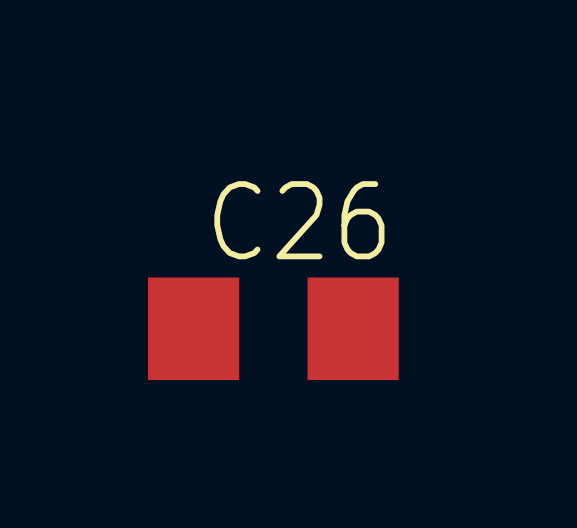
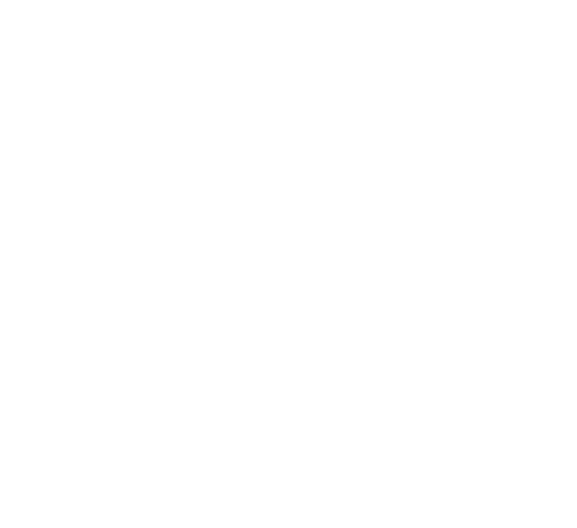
C26: (273, 328) -> none

